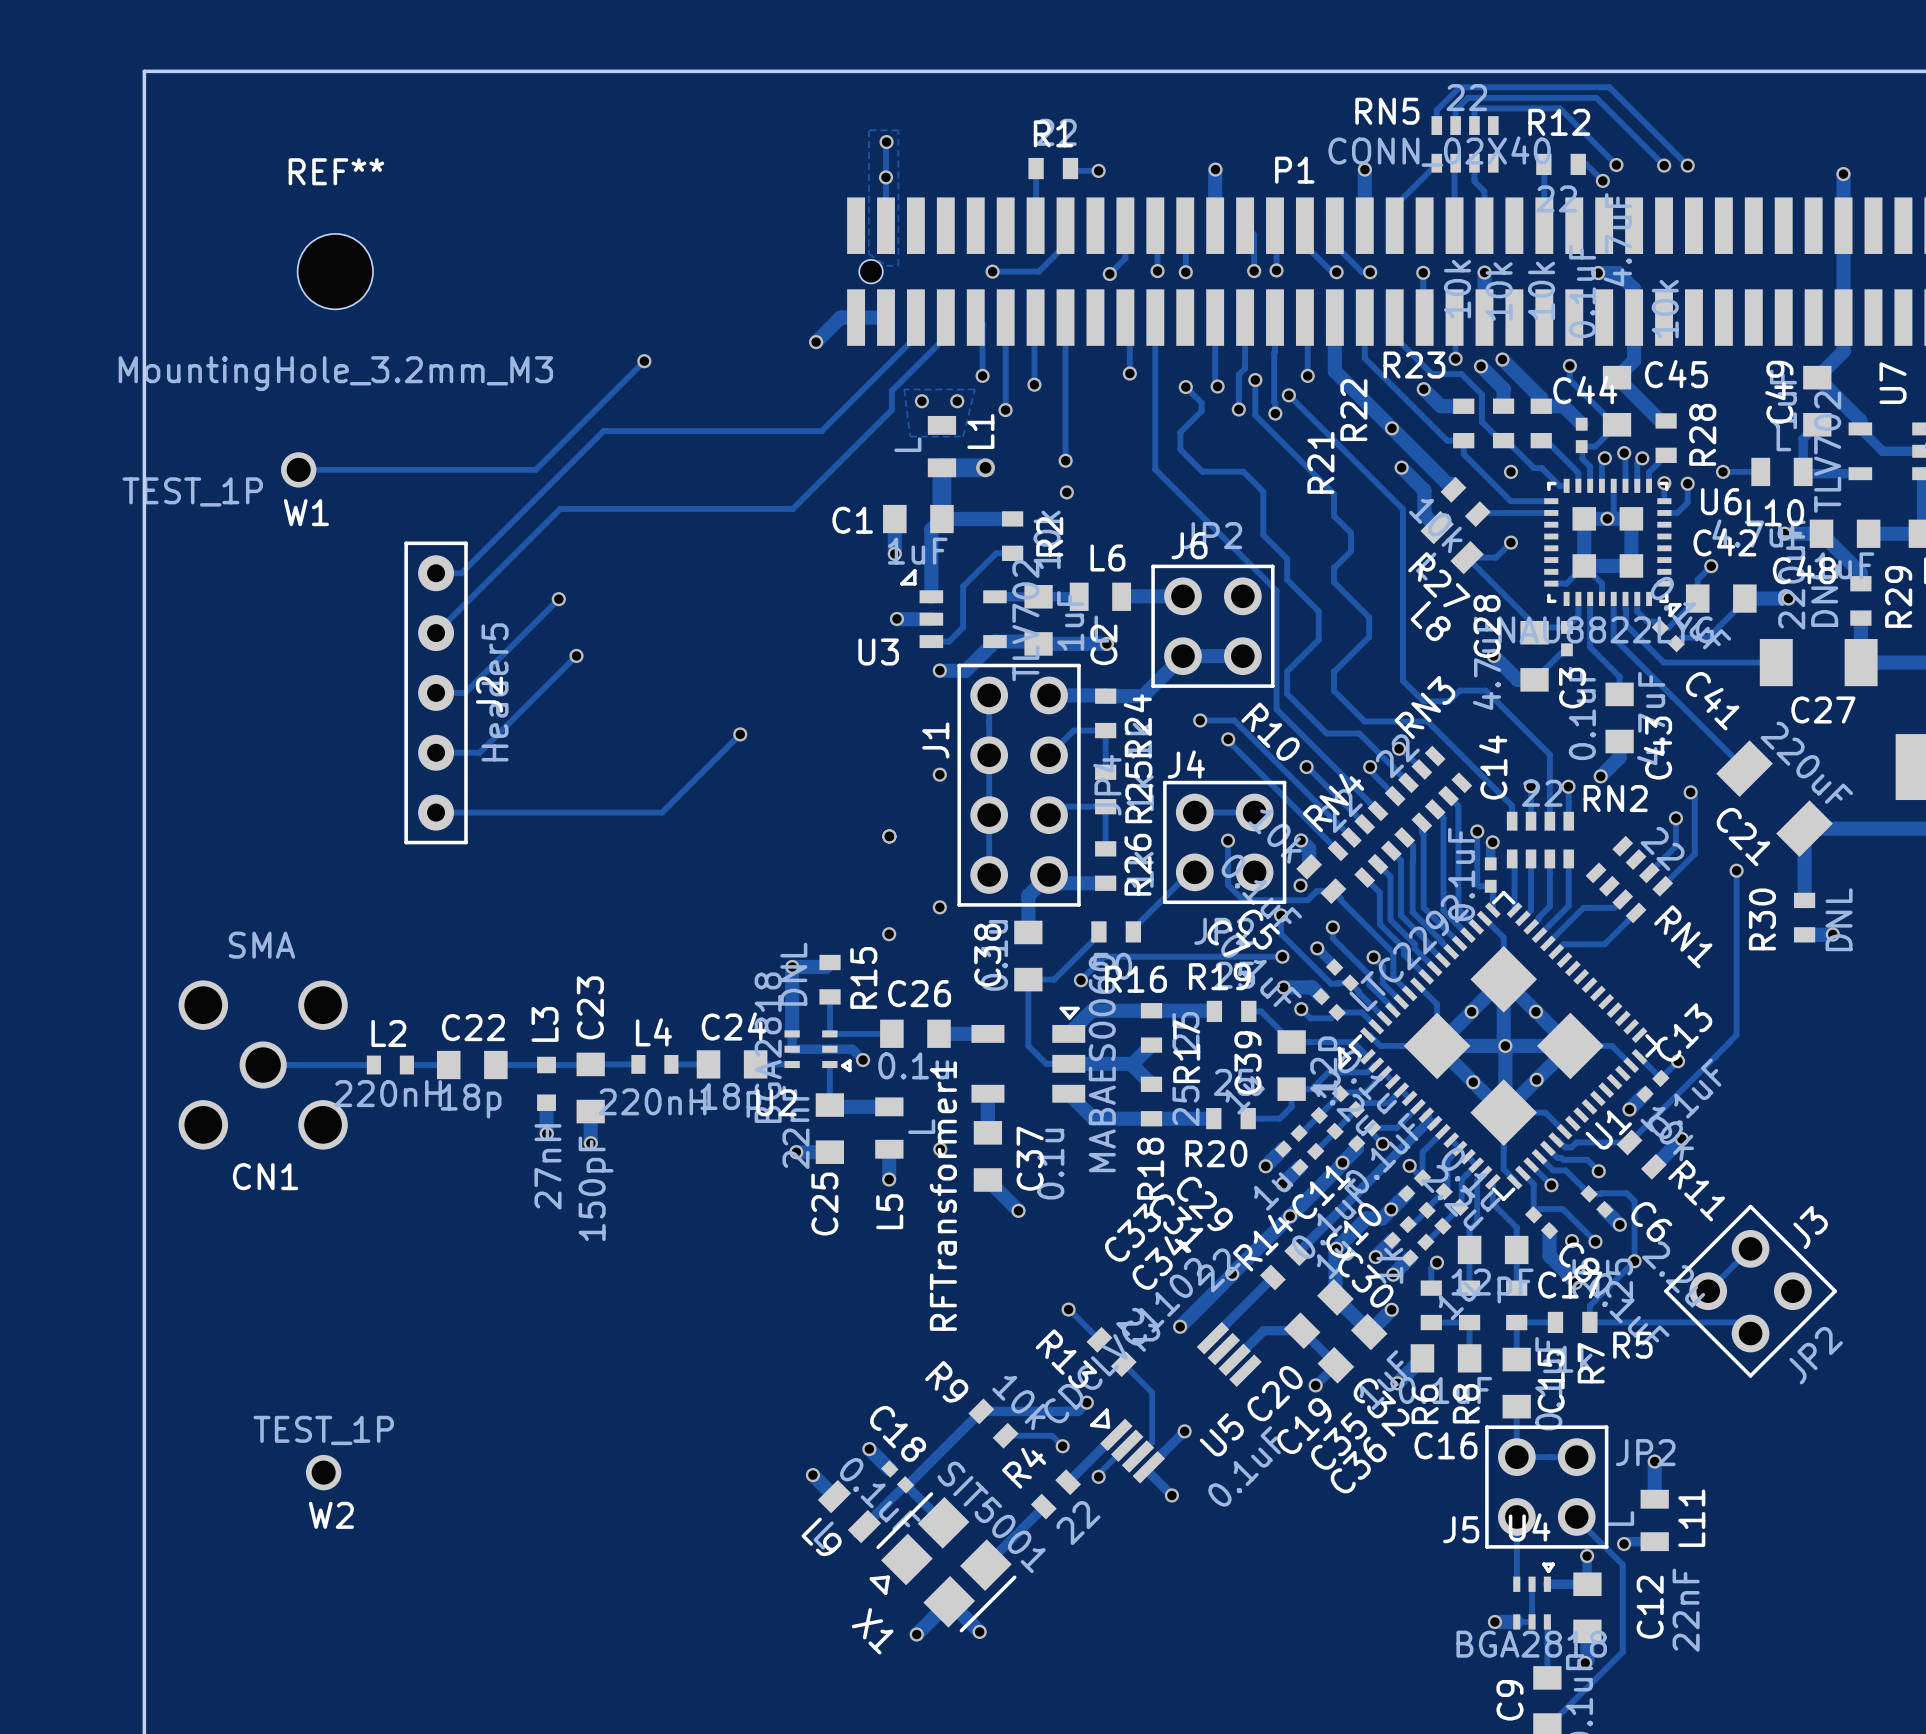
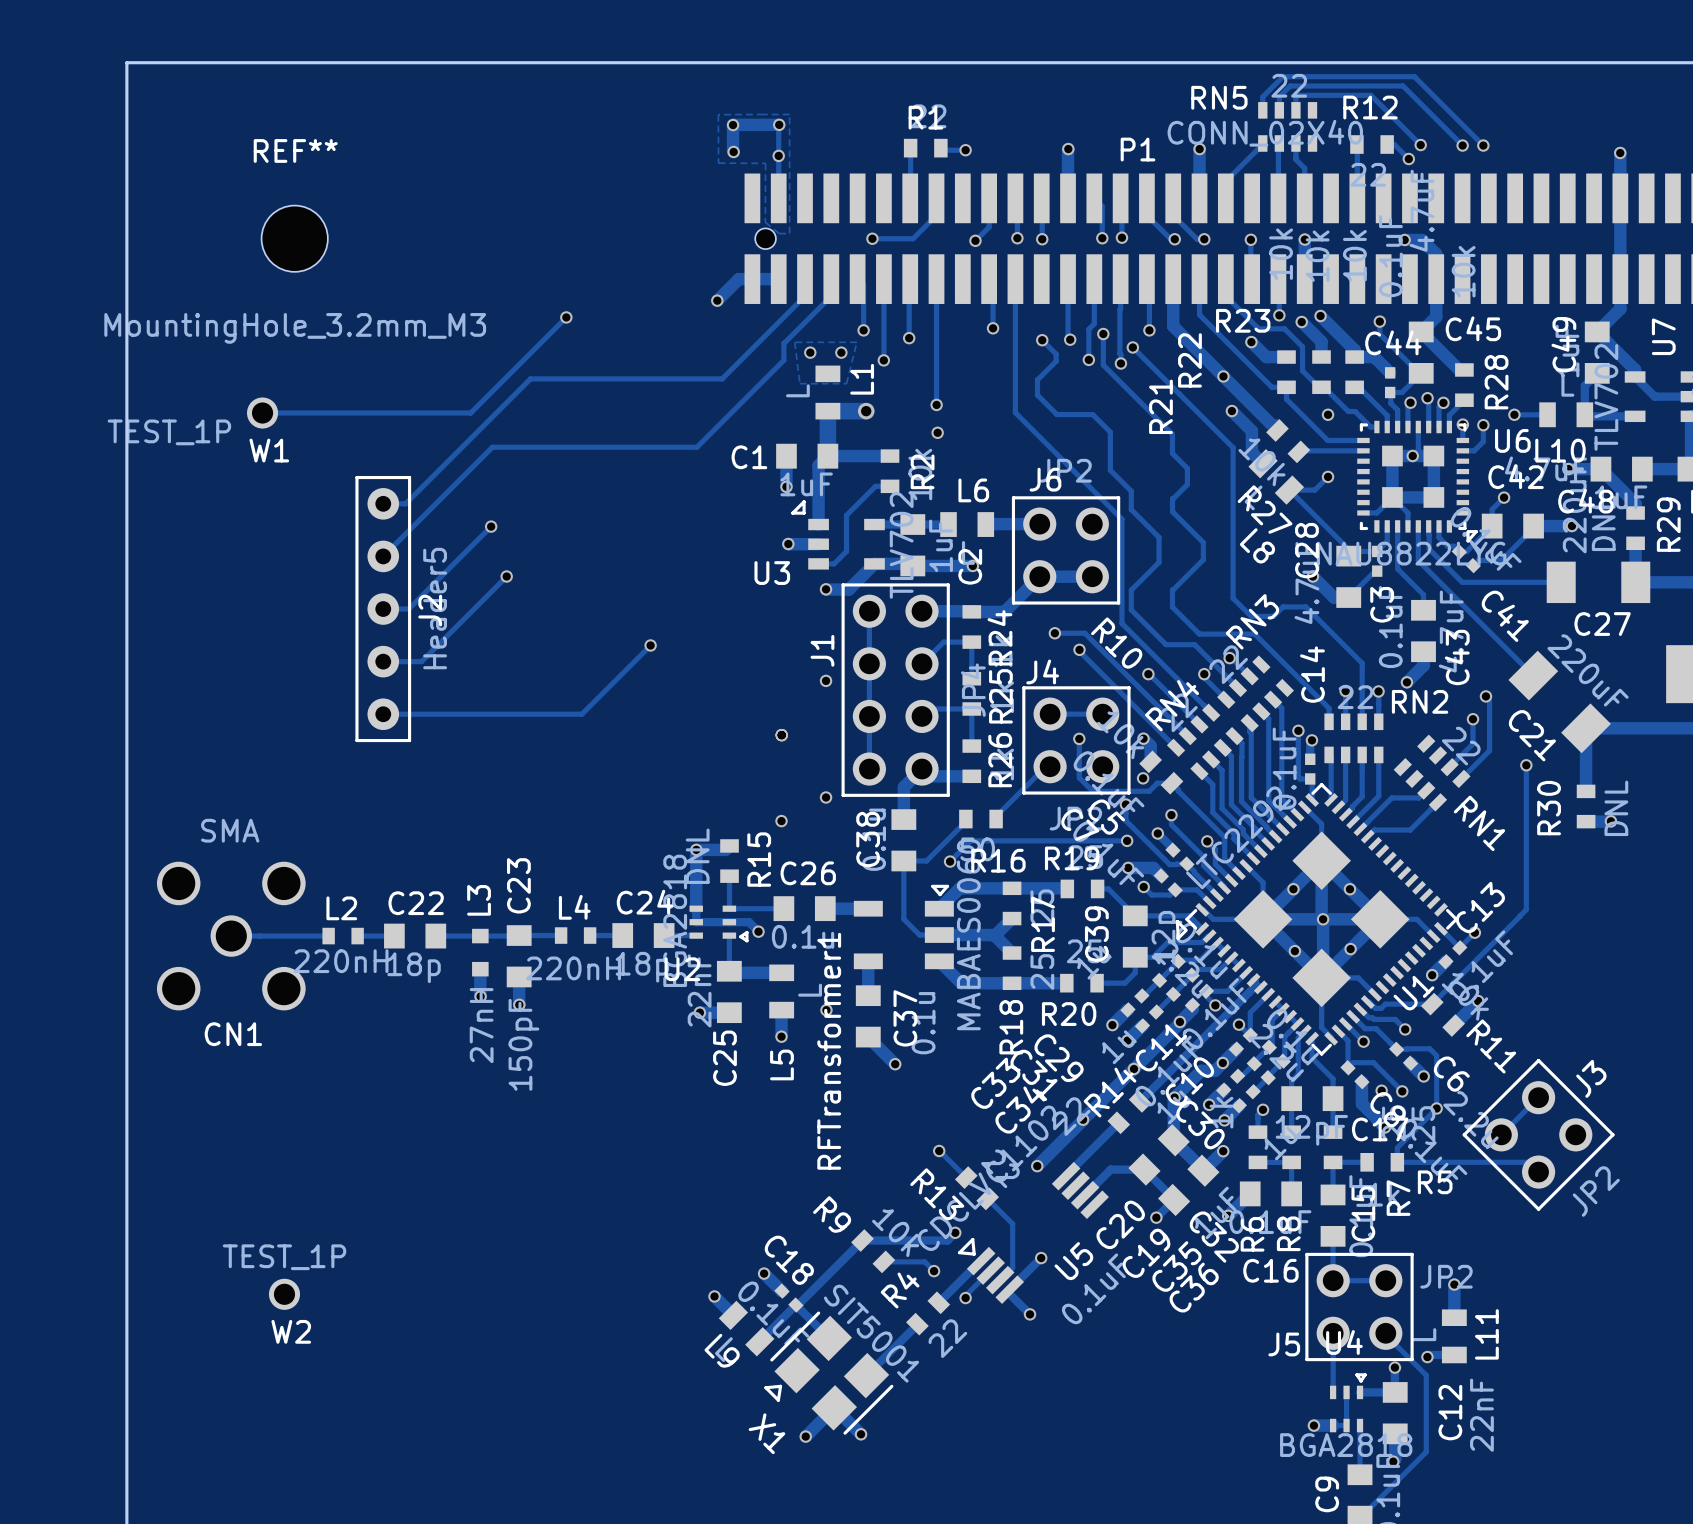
zone outline: (868, 130) (868, 253) (886, 265) -> (763, 114) (718, 114) (718, 163) (765, 163) (765, 222) (779, 233)
track: none -> (733, 124) (779, 124)
track: none -> (733, 125) (733, 151)
via: none -> (733, 125)
via: none -> (733, 151)

